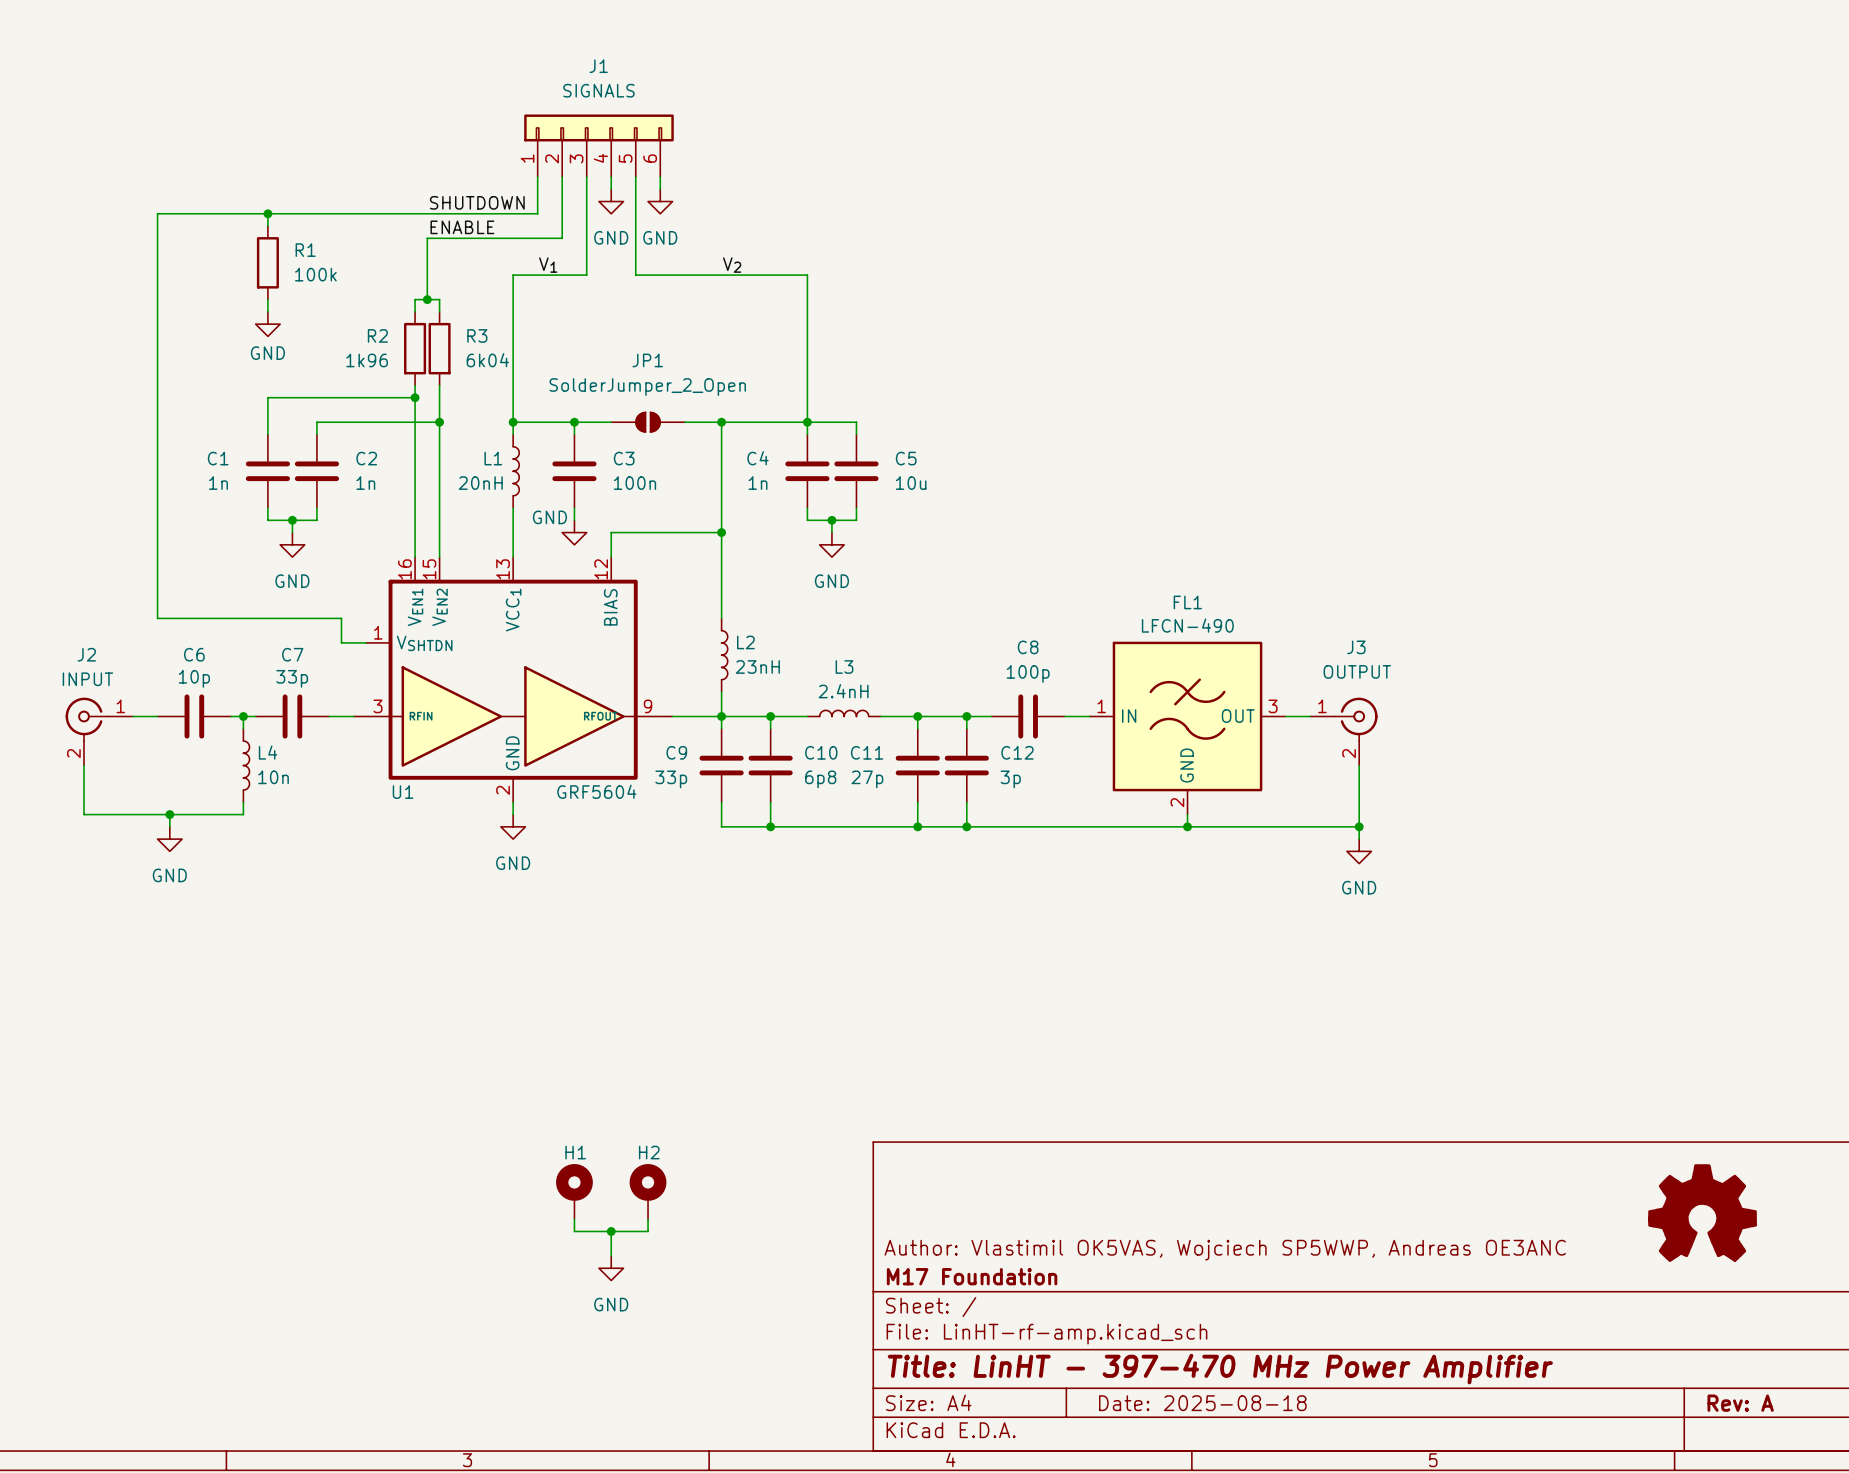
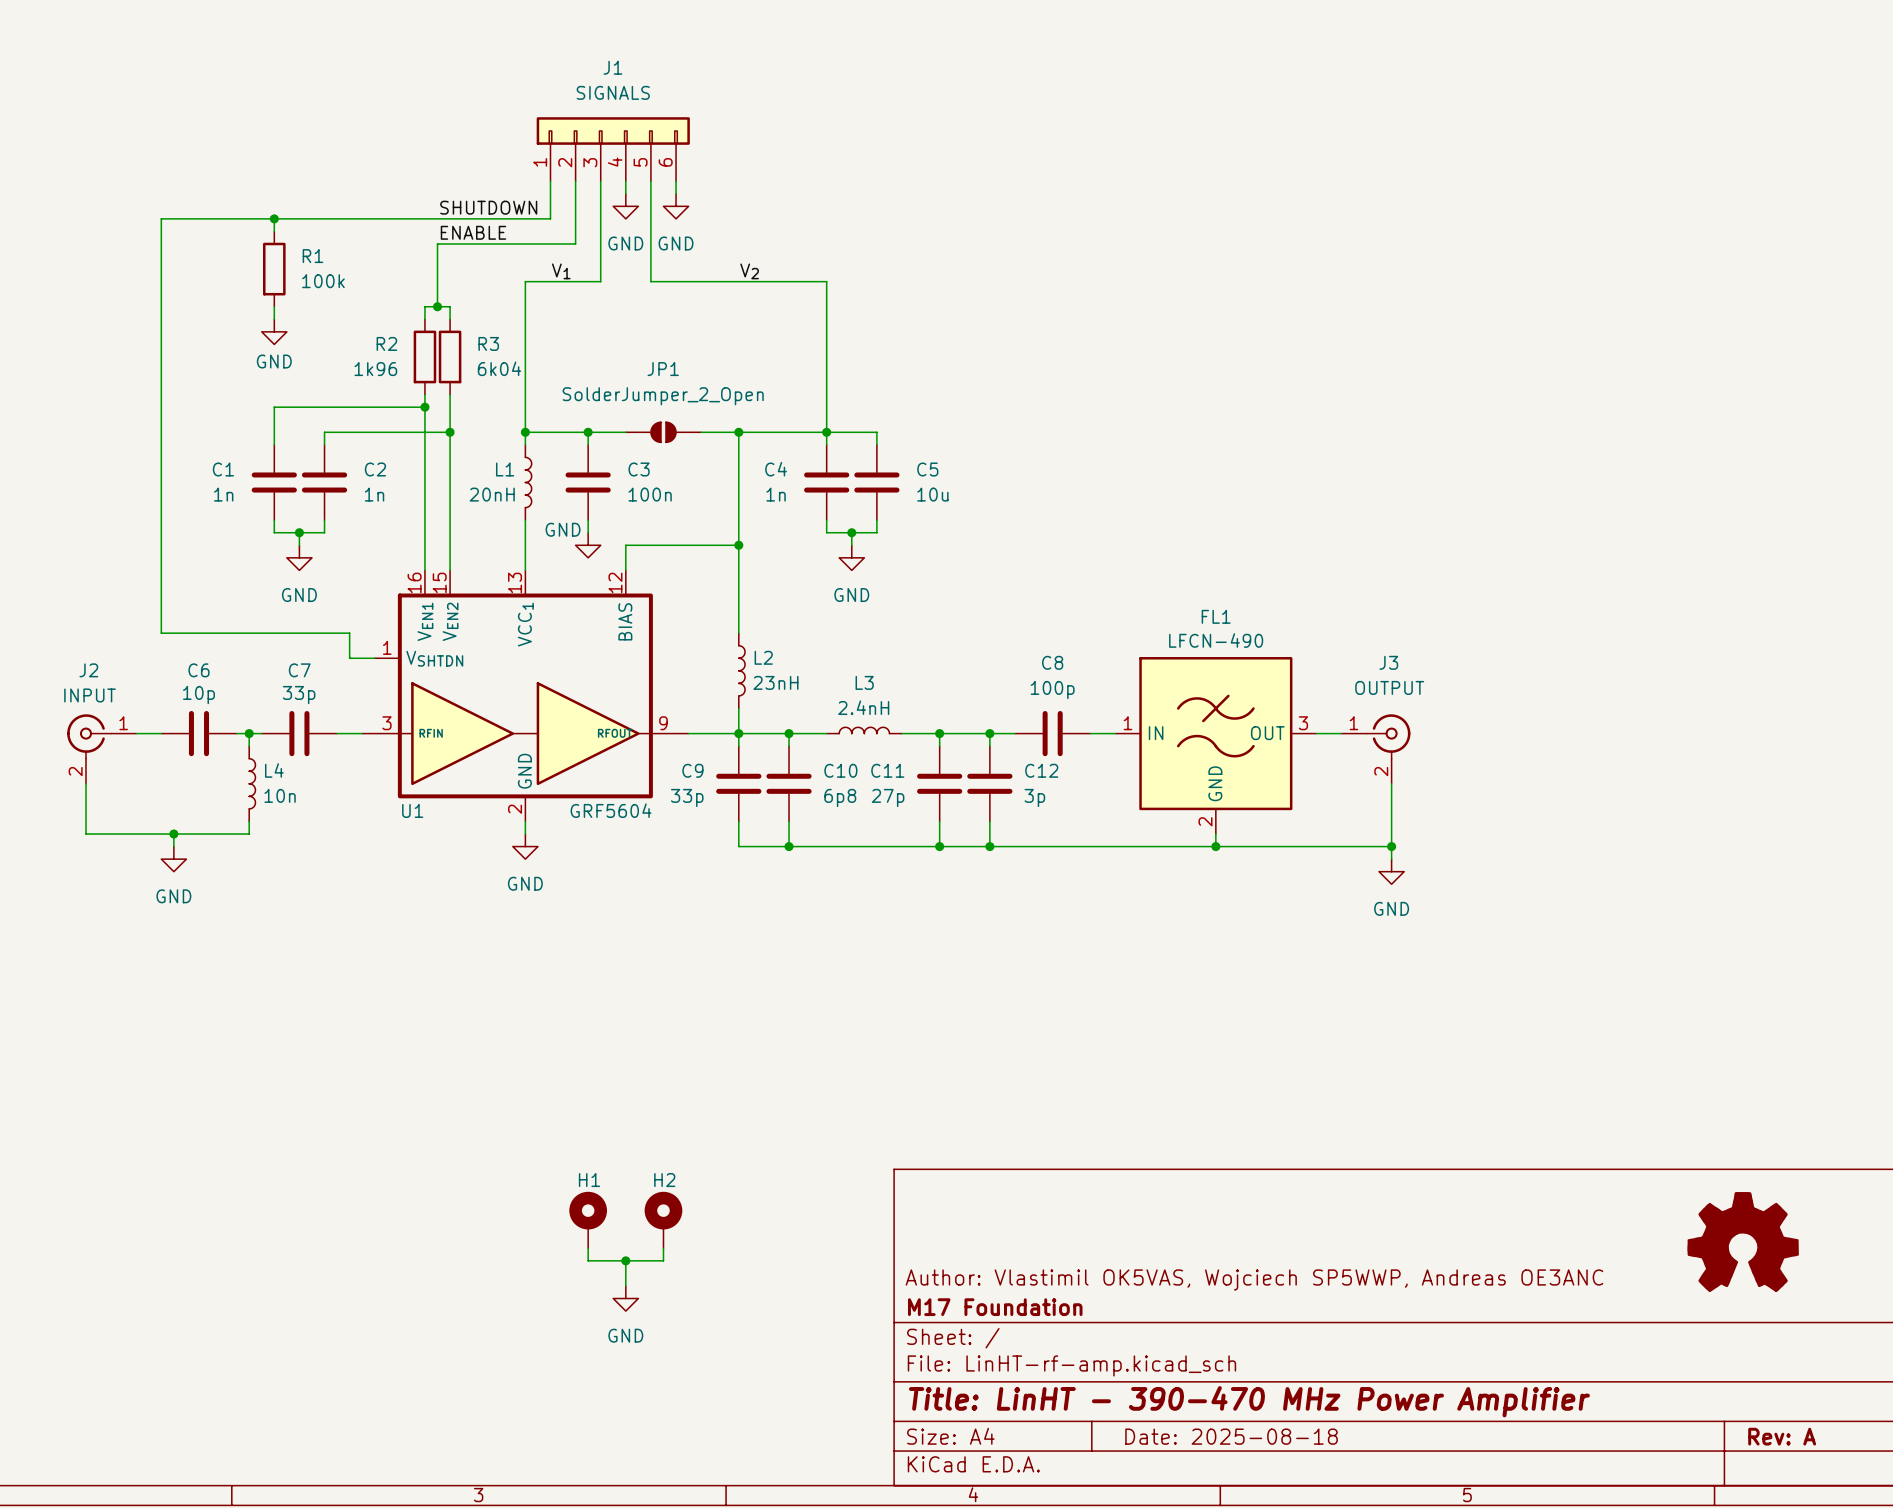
title block: Title: LinHT - 397-470 MHz Power Amplifier (1220, 1369) -> Title: LinHT - 390-470 MHz Power Amplifier (1249, 1401)

